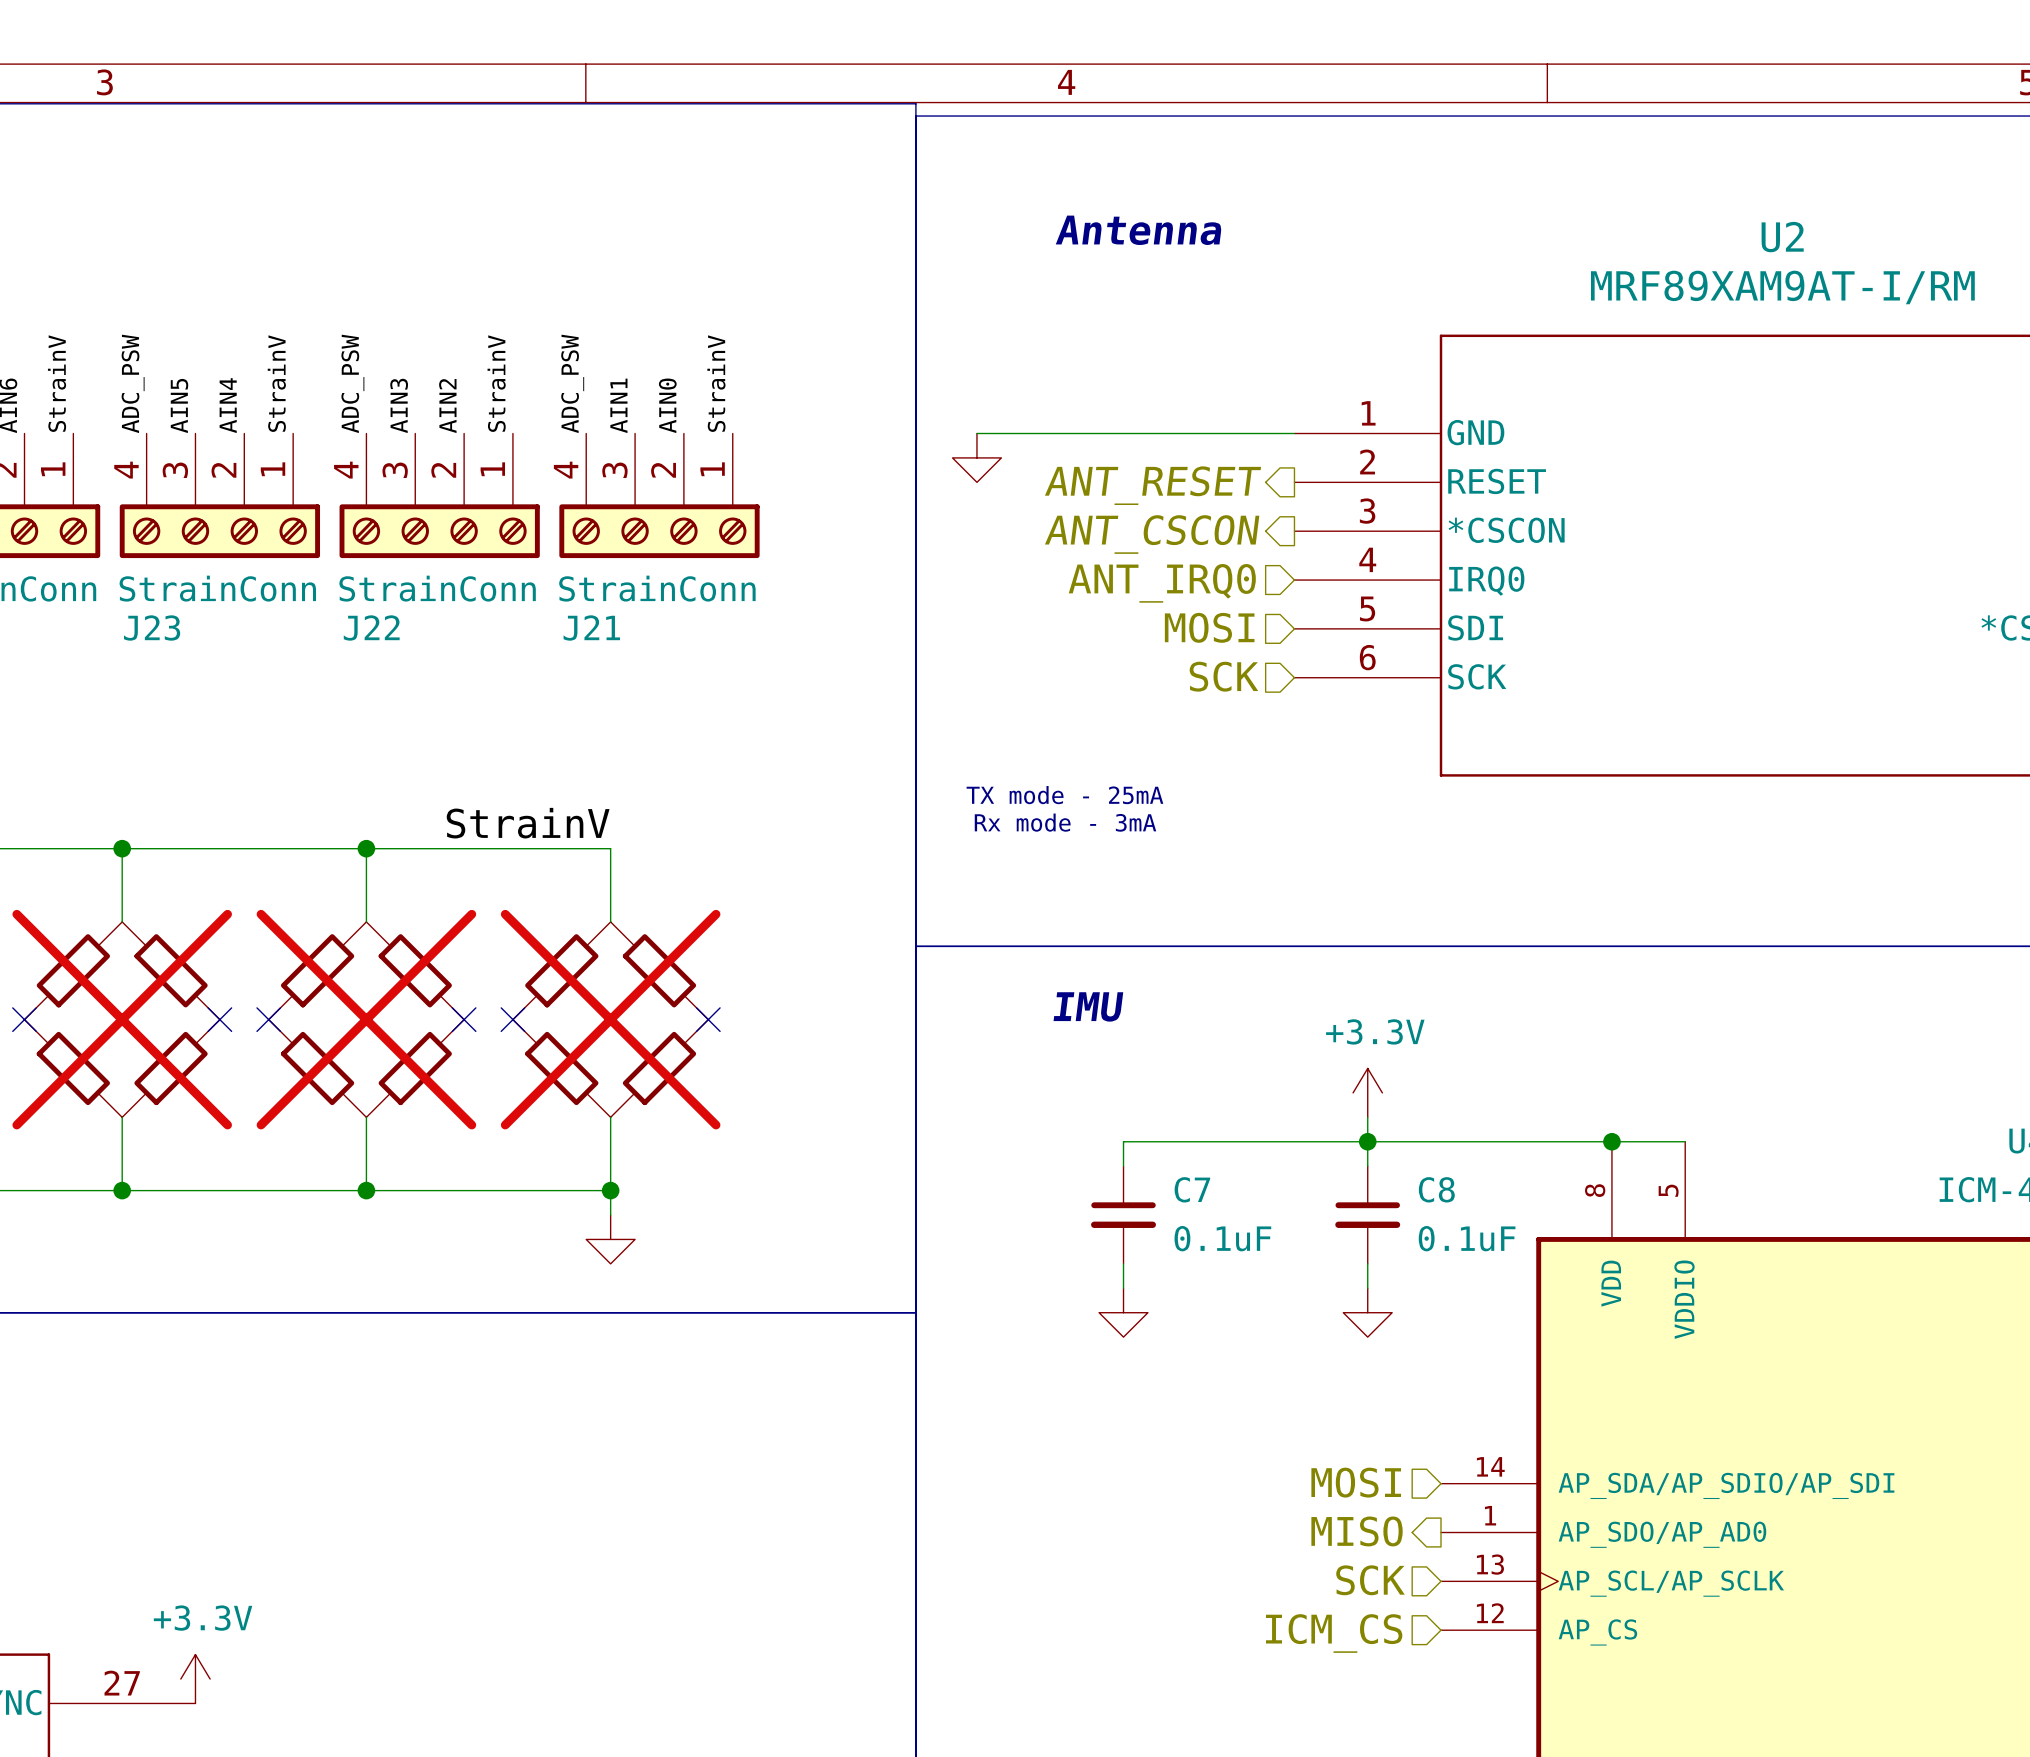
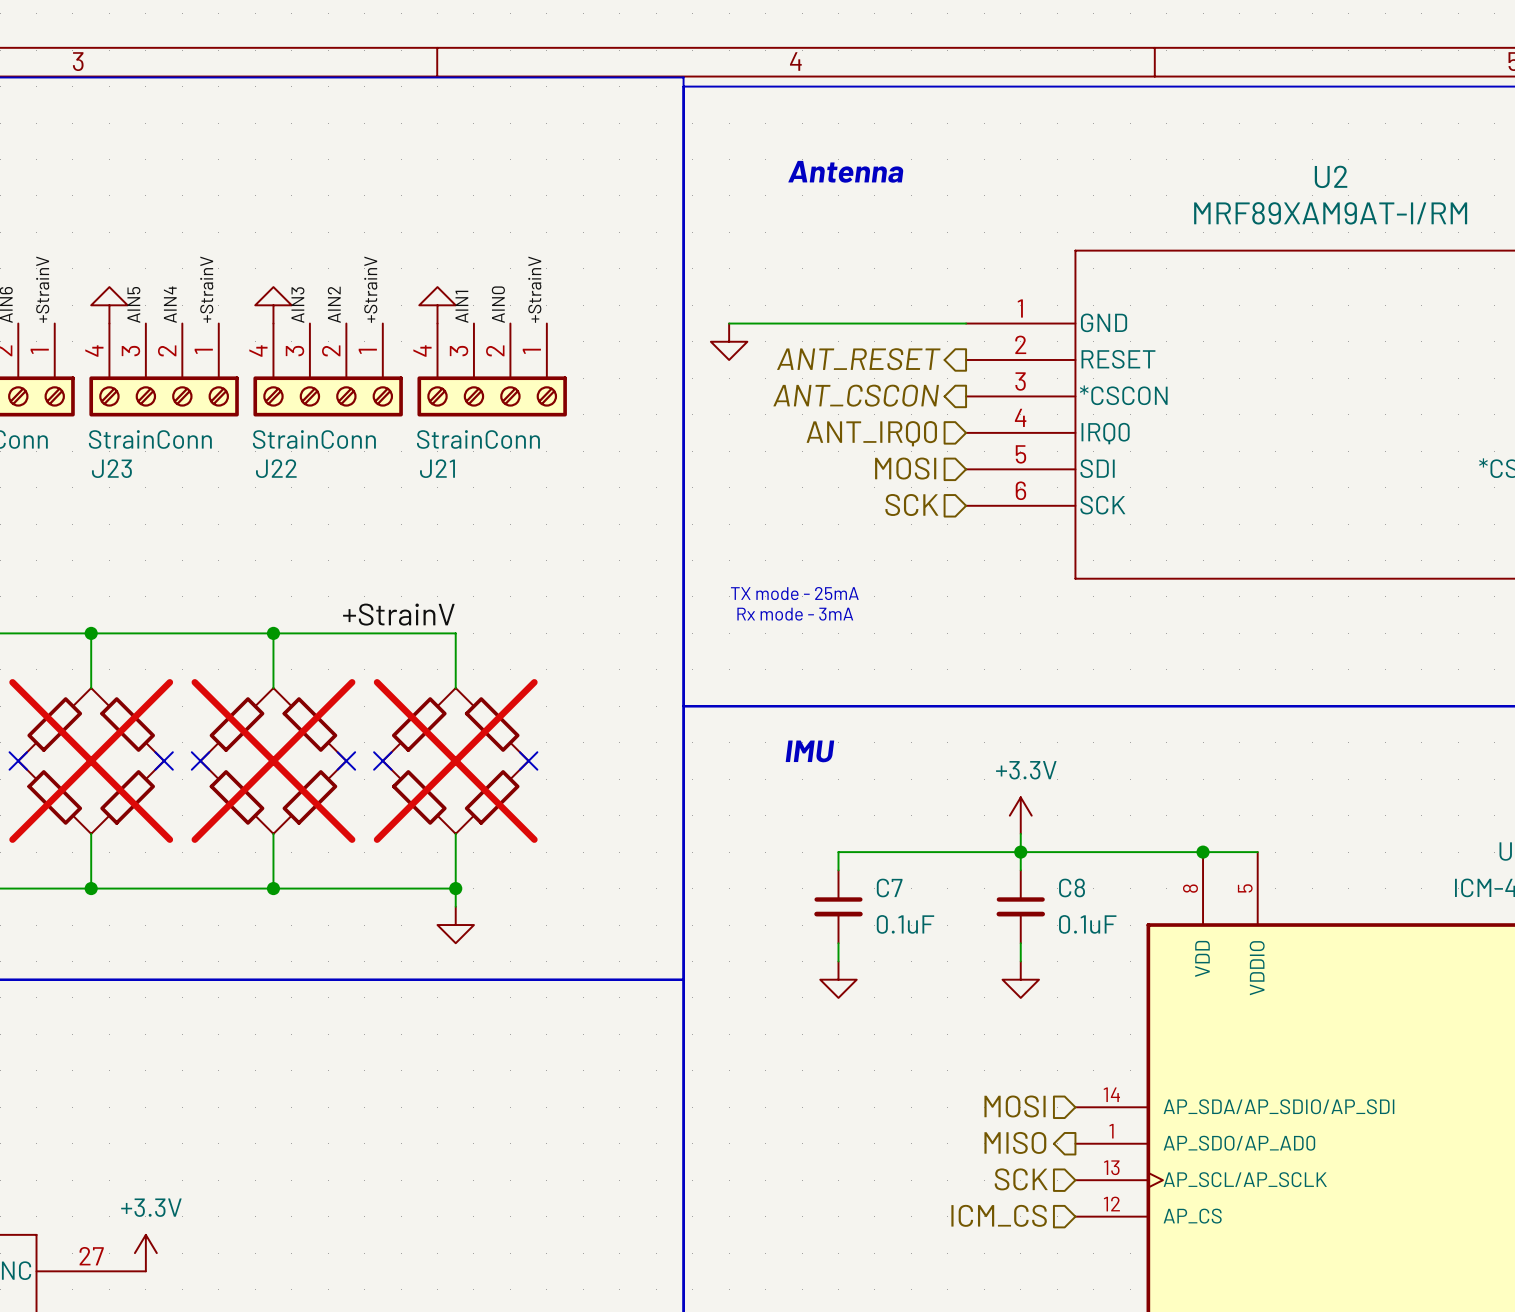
label: StrainV (57, 383) -> +StrainV (42, 289)
label: ADC_PSW (133, 383) -> none
label: StrainV (276, 383) -> +StrainV (206, 289)
label: ADC_PSW (352, 383) -> none
label: StrainV (496, 383) -> +StrainV (370, 289)
label: ADC_PSW (572, 383) -> none
label: StrainV (716, 383) -> +StrainV (534, 289)
power symbol: none -> (109, 305)
power symbol: none -> (273, 305)
power symbol: none -> (437, 305)
label: StrainV (528, 823) -> +StrainV (398, 614)

